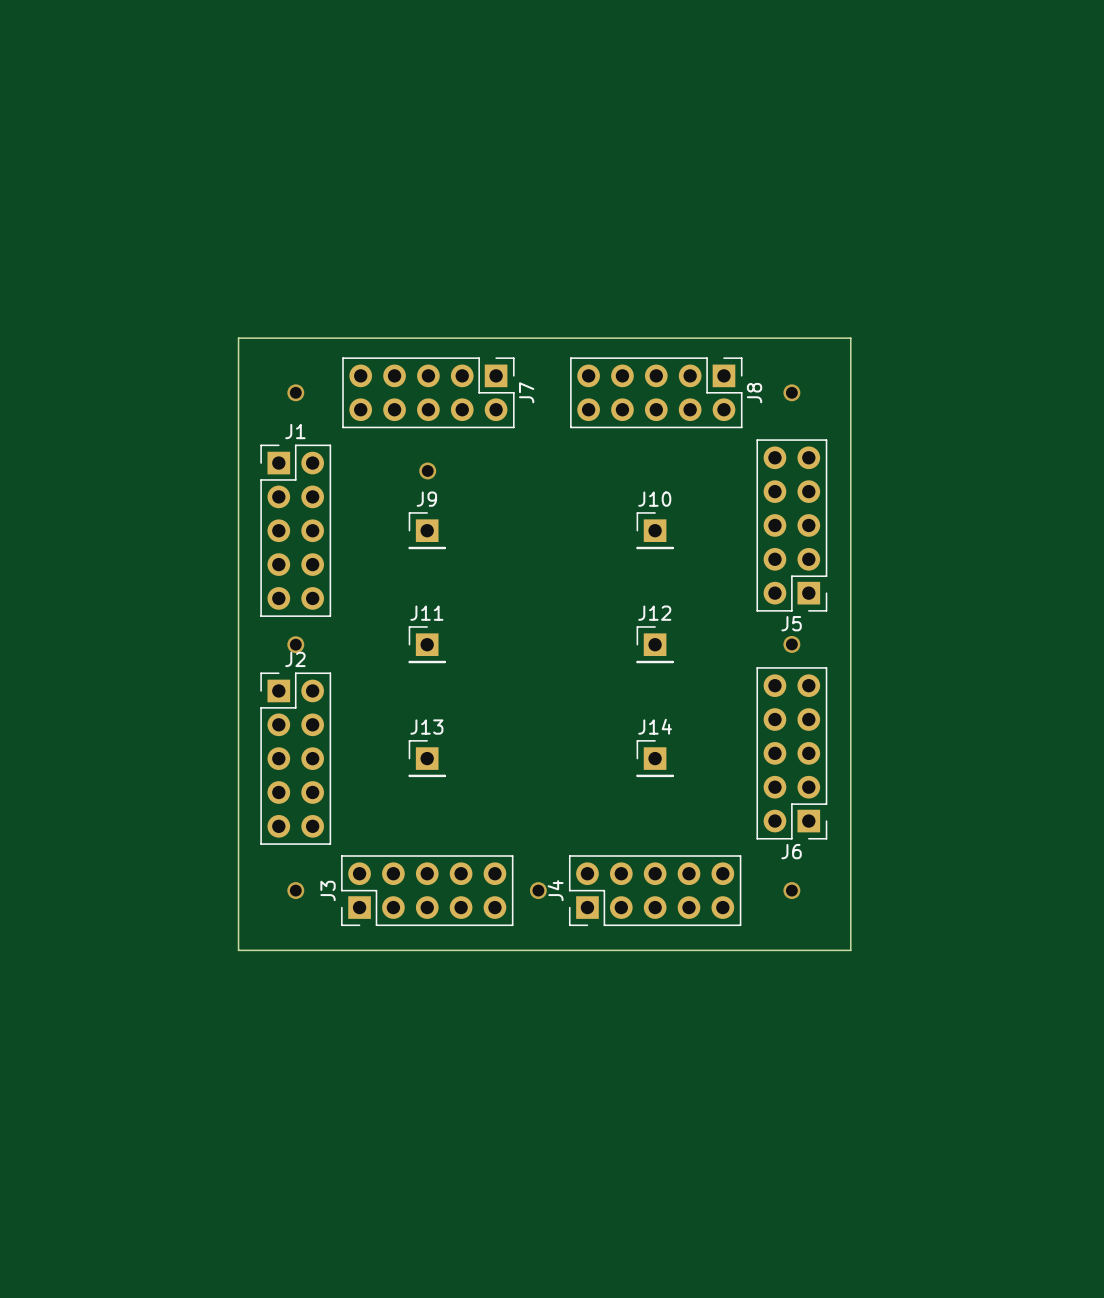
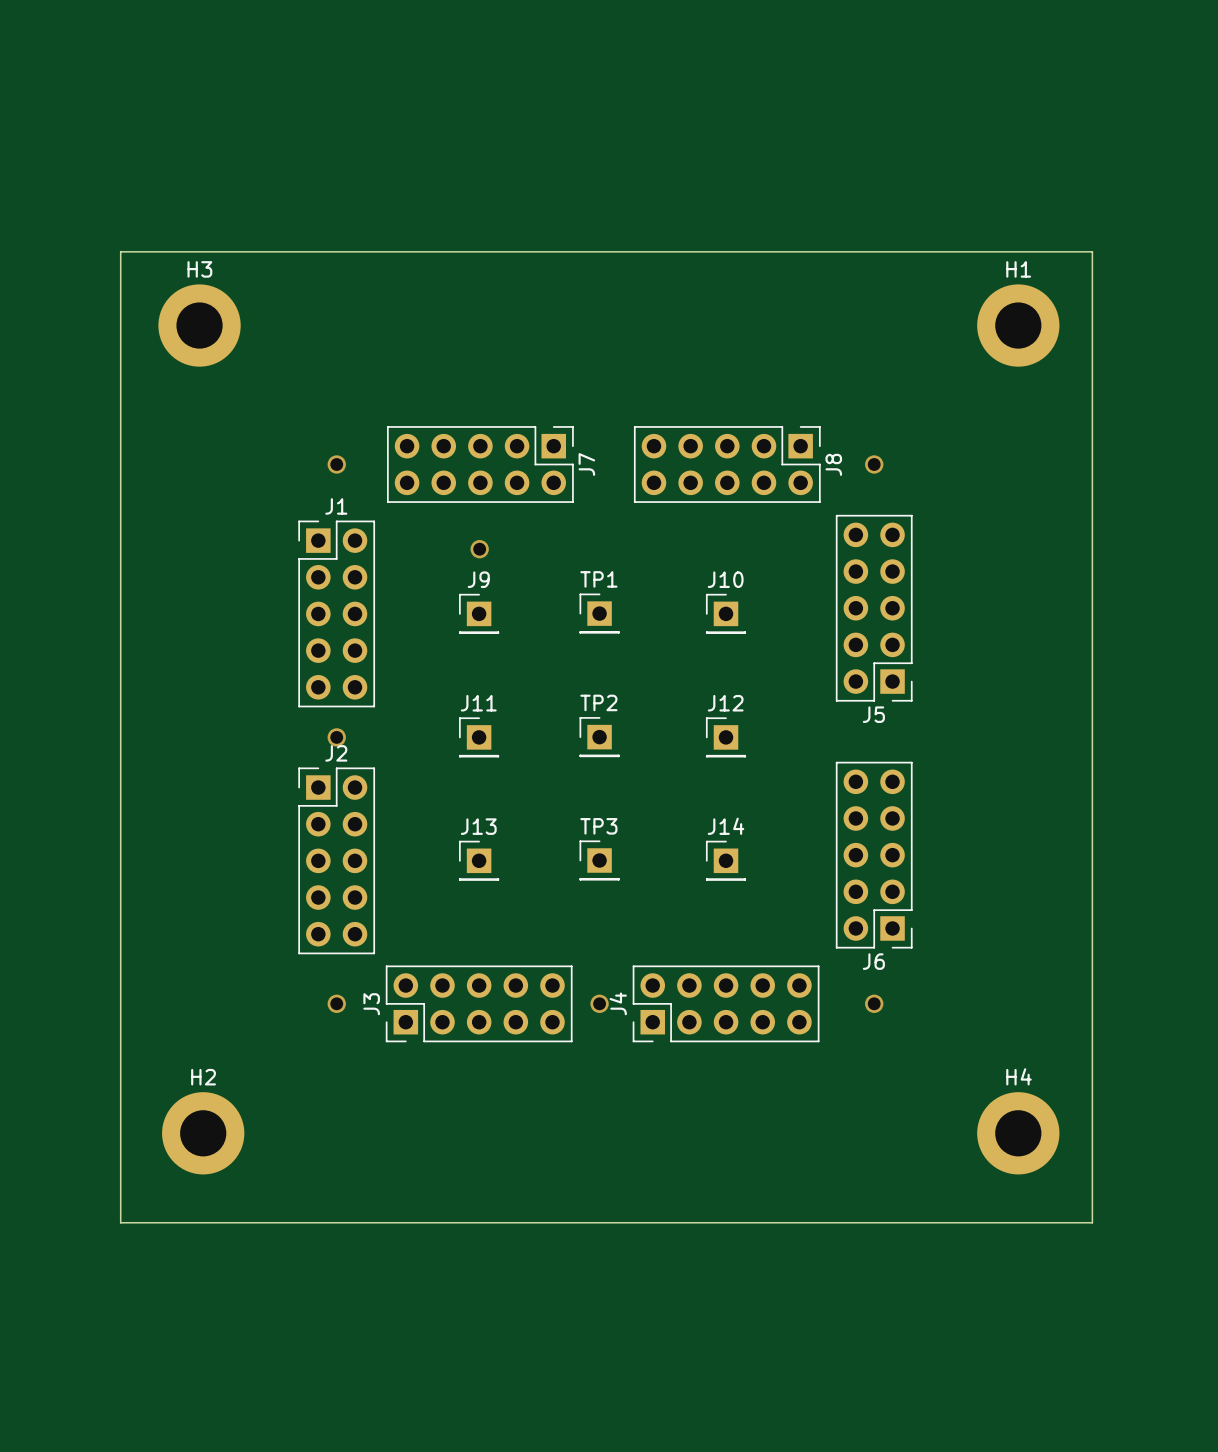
board edge: none -> (120, 251) (1092, 251) (1092, 1222) (120, 1222) (120, 251)
H3: none -> (199, 325)
H1: none -> (1018, 325)
board edge: (238, 338) (850, 338) (850, 950) (238, 950) (238, 338) -> none
TP1: none -> (599, 613)
TP2: none -> (599, 737)
via: (791, 644) -> none
TP3: none -> (599, 860)
H2: none -> (203, 1133)
H4: none -> (1018, 1133)

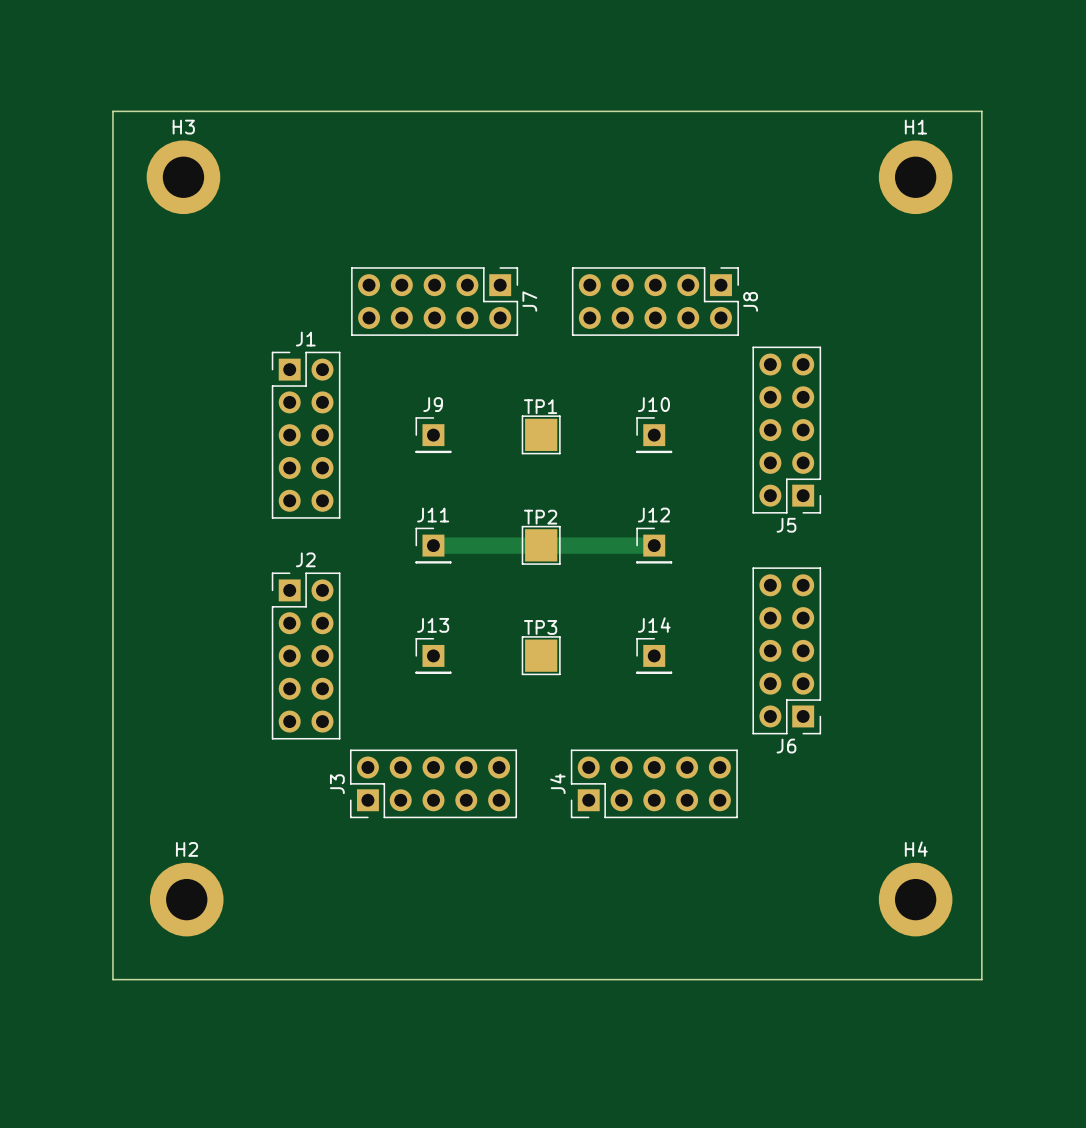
via: (336, 464) -> none
via: (874, 464) -> none
via: (479, 549) -> none
TP1 footprint: [579, 593, 620, 634] -> [521, 415, 561, 455]
TP2 footprint: [579, 717, 620, 758] -> [521, 525, 561, 565]
via: (336, 737) -> none
track: none -> (433, 545) (654, 545)
TP3 footprint: [579, 840, 620, 881] -> [521, 636, 561, 676]
via: (336, 1003) -> none
via: (599, 1003) -> none
via: (874, 1003) -> none

